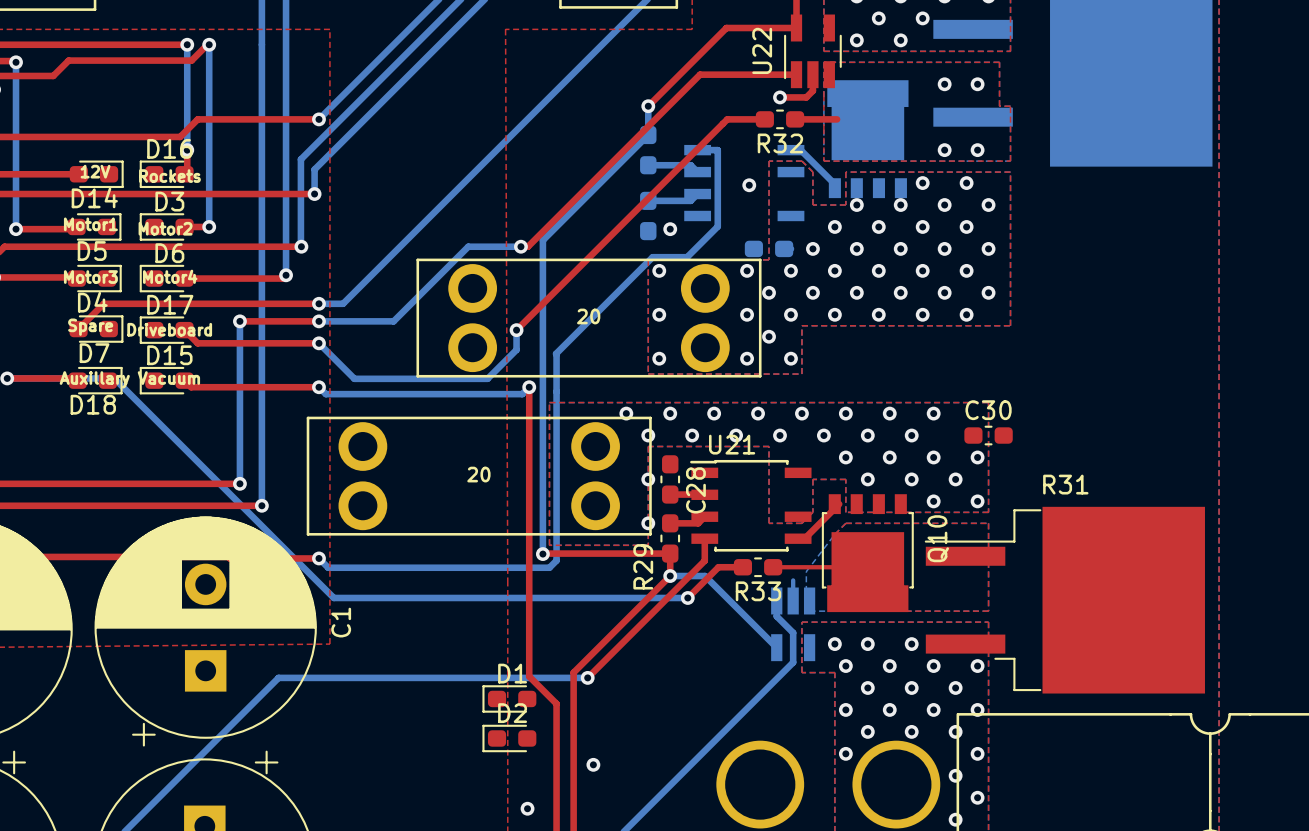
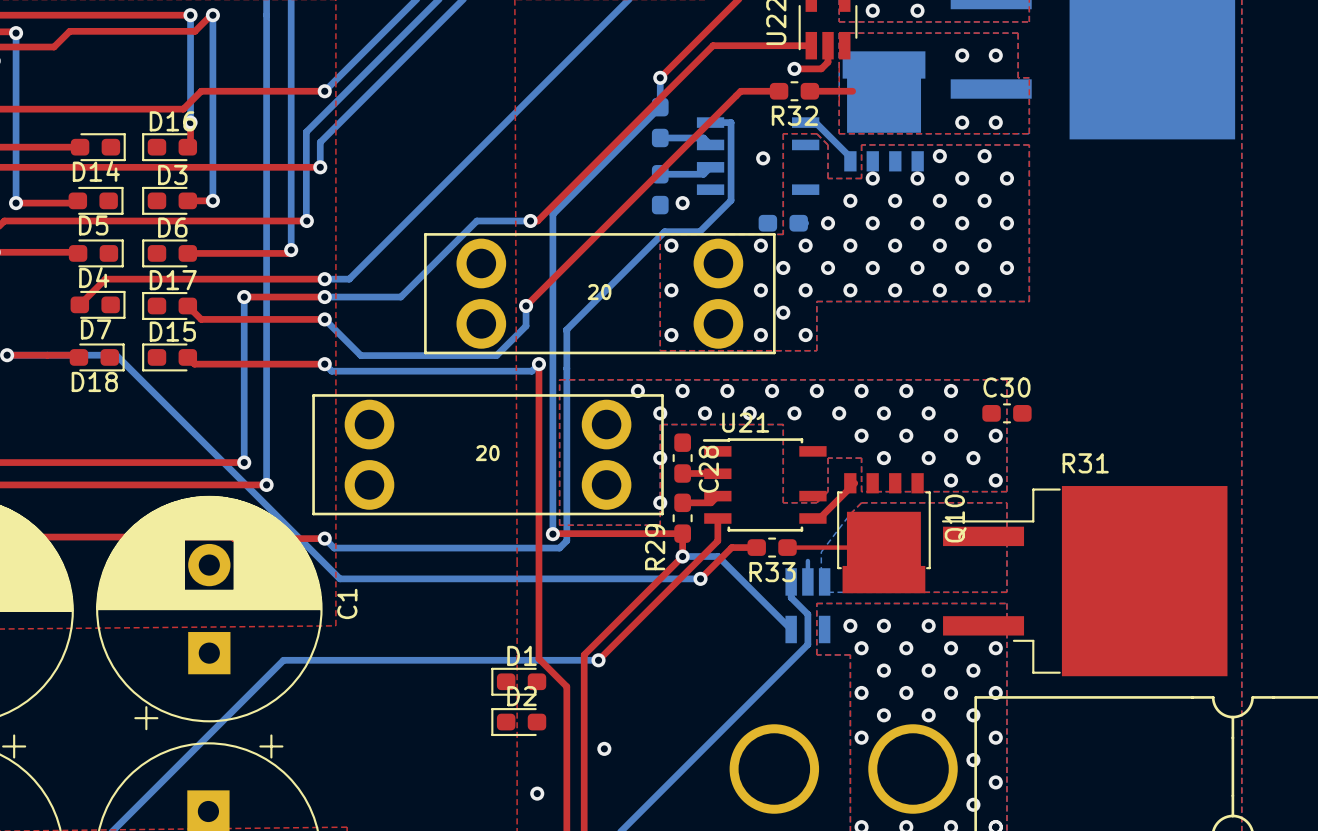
text: 12V (95, 171) -> none
text: Rockets (169, 176) -> none
text: Motor1 (90, 224) -> none
text: Motor2 (165, 228) -> none
text: Motor4 (170, 276) -> none
text: Motor3 (90, 277) -> none
text: Spare (90, 327) -> none
text: Driveboard (169, 329) -> none
text: Vacuum (168, 378) -> none
text: Auxillary (94, 379) -> none

